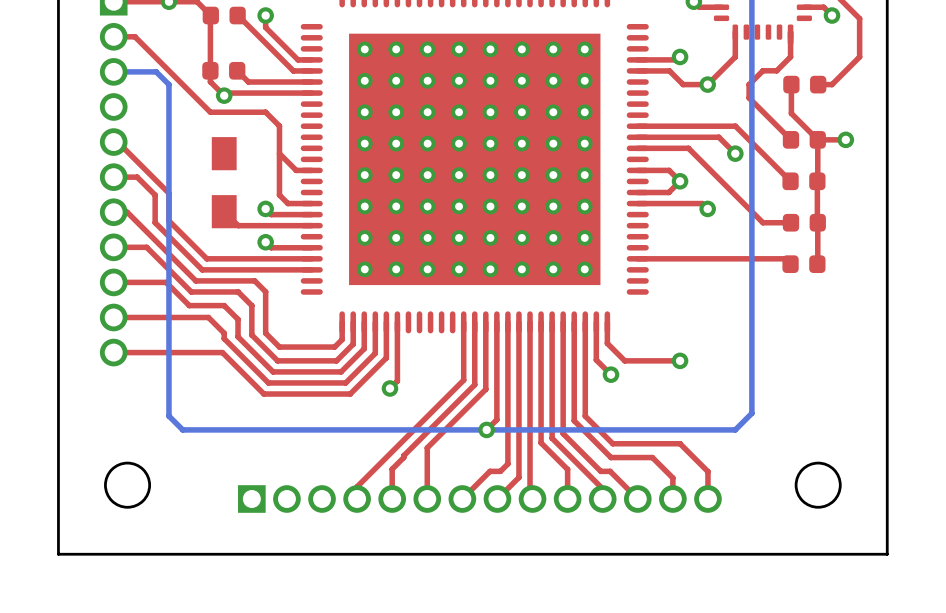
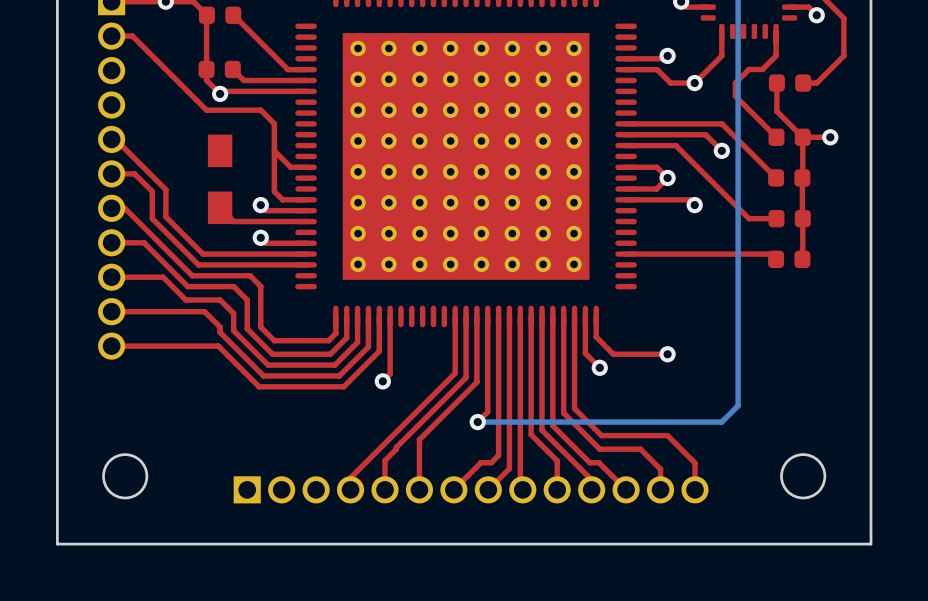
top track: (265, 15) (265, 27) (298, 59) (311, 59) -> none
via: (265, 15) -> none
bottom track: (113, 71) (156, 71) (168, 84) (168, 416) (182, 429) (486, 429) -> none

